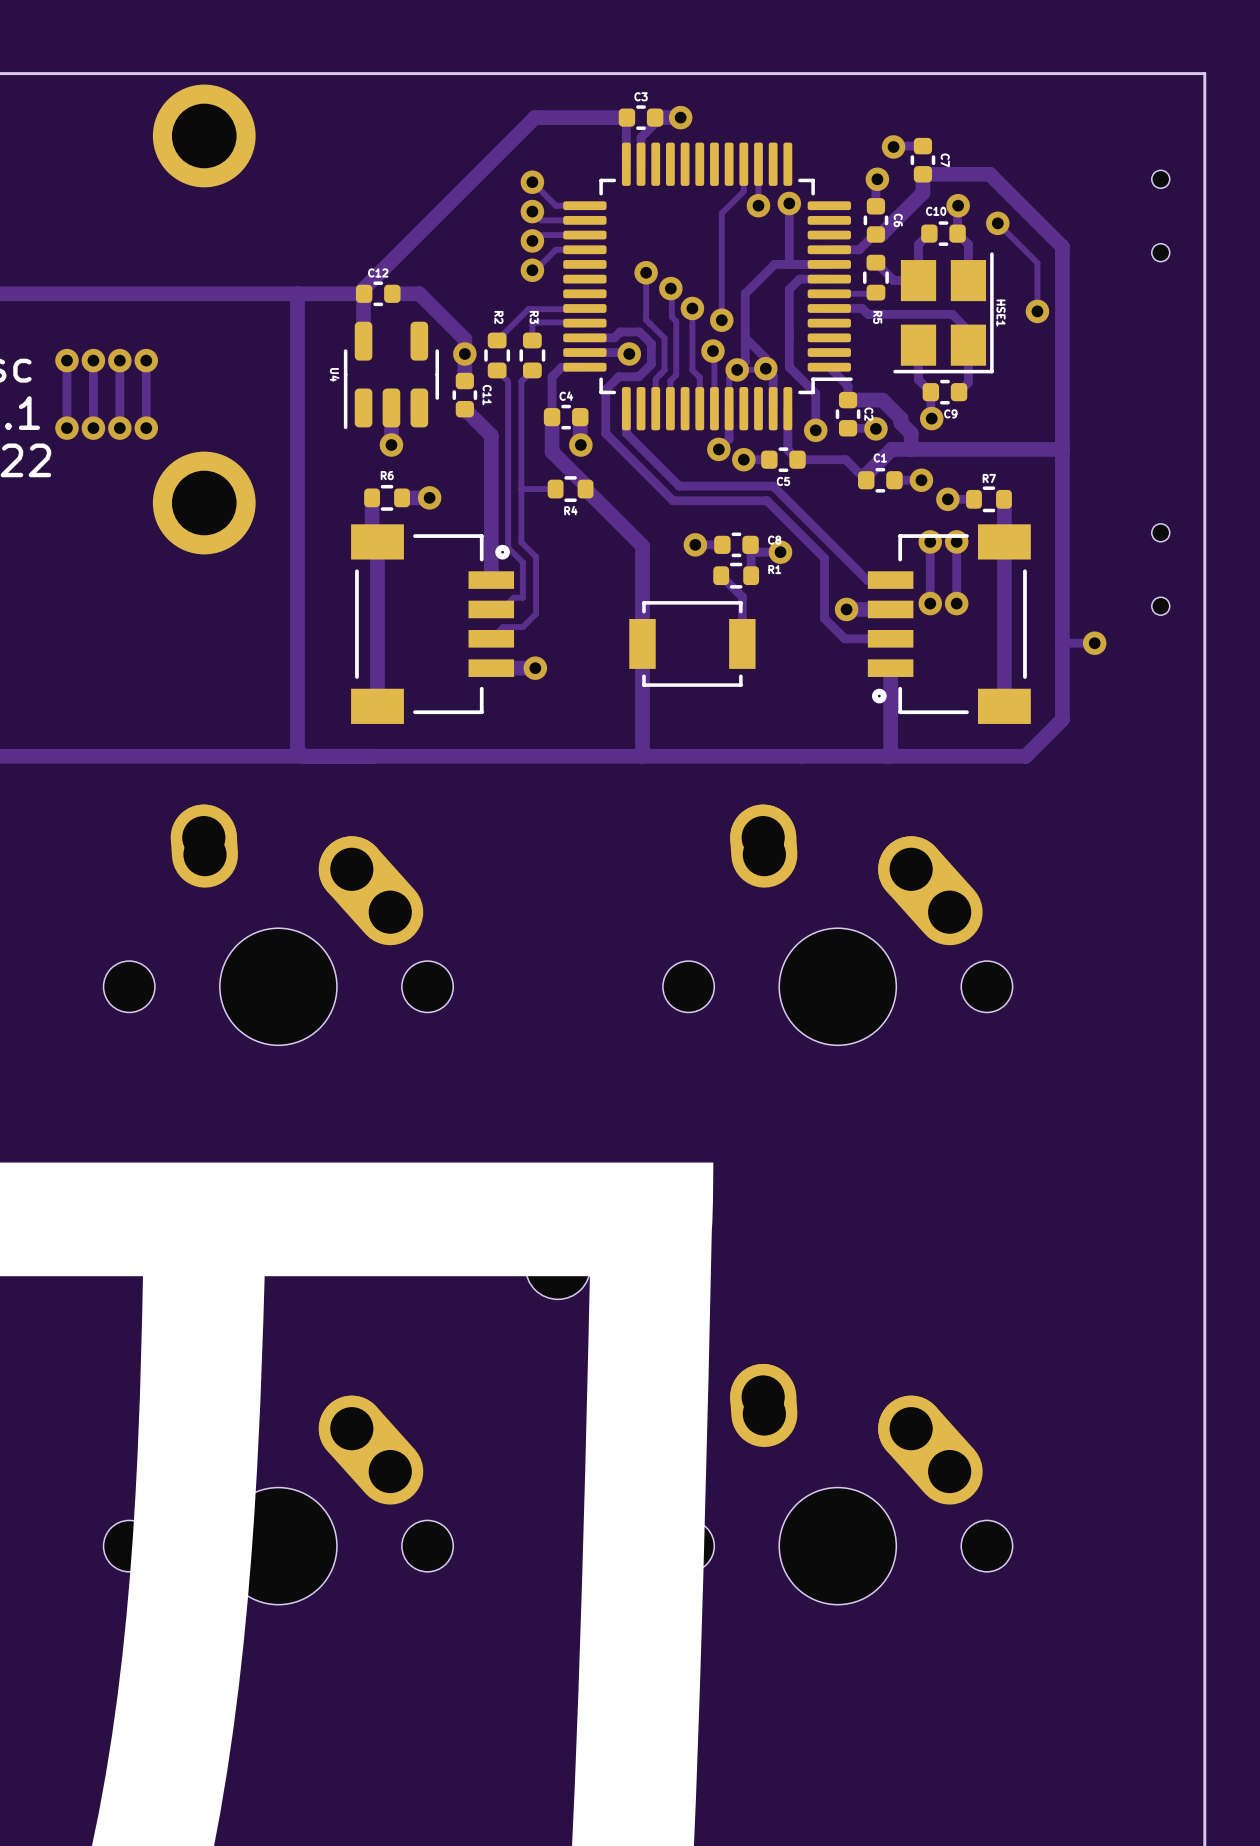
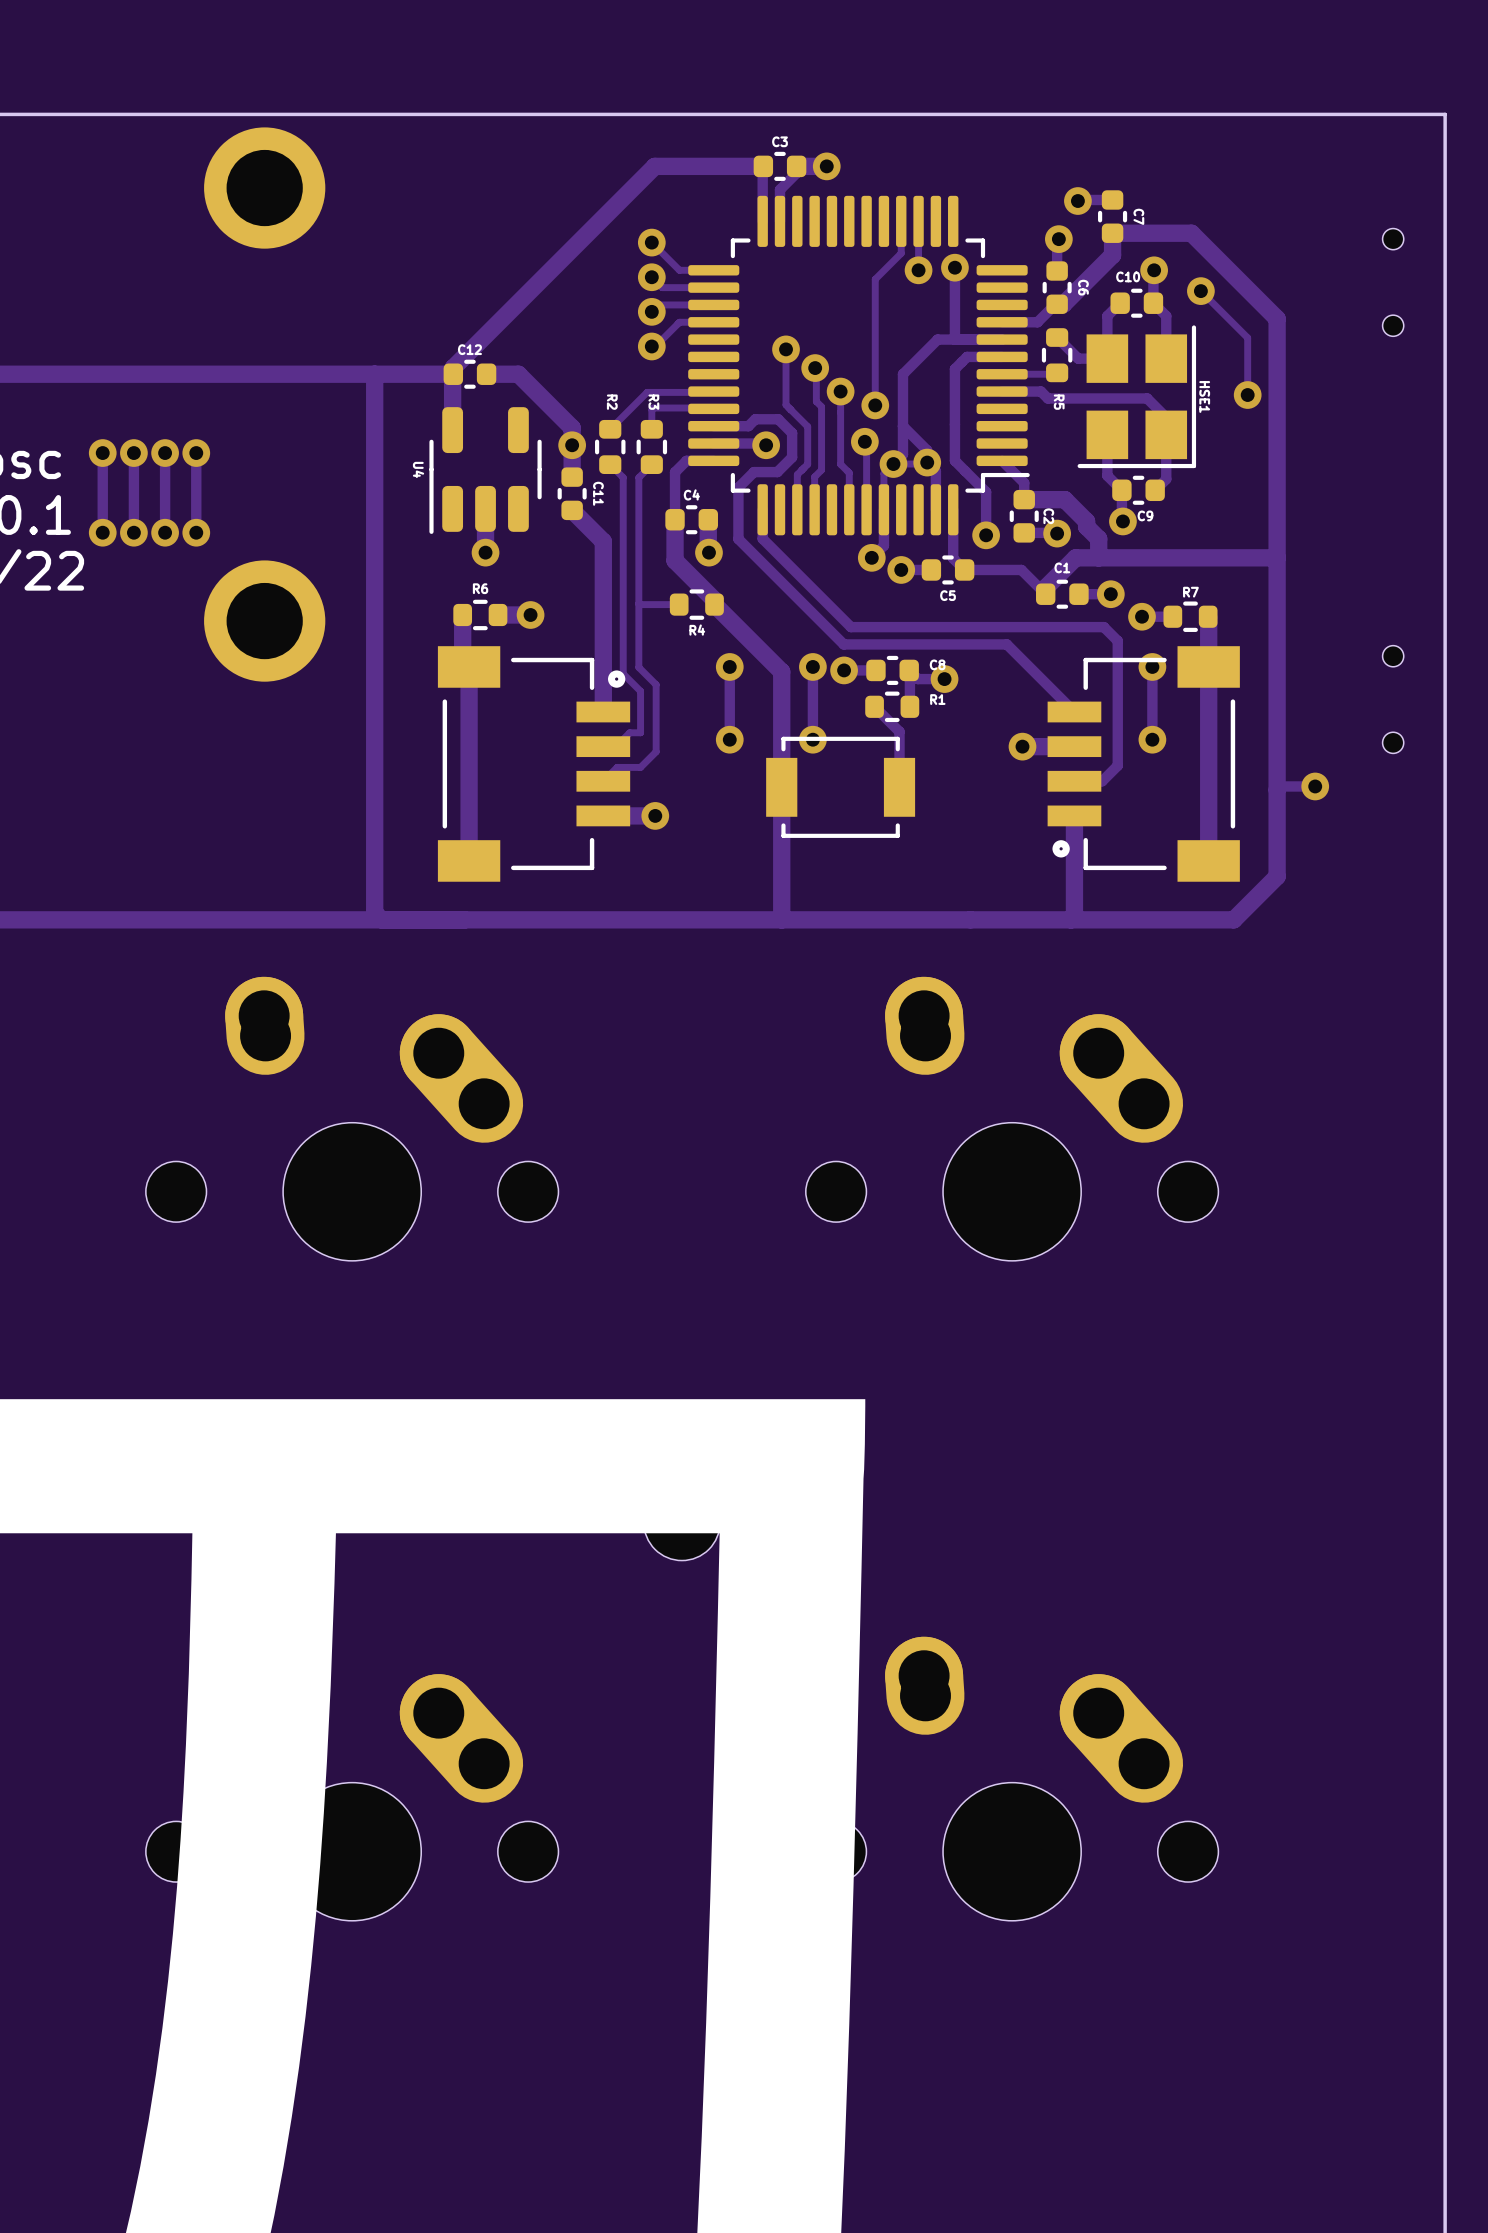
track: (679, 486) (773, 486) (867, 580) (890, 580) -> (817, 618) (843, 644) (1006, 644) (1074, 711)
track: (673, 500) (767, 500) (824, 558) (824, 618) (844, 638) (890, 638) -> (824, 601) (850, 627) (1103, 627) (1117, 640) (1117, 765) (1102, 781) (1074, 781)
via: none -> (729, 666)
via: none -> (812, 666)
via: (930, 541) -> none
track: none -> (729, 673) (729, 739)
track: (930, 547) (930, 603) -> (812, 673) (812, 739)
via: none -> (729, 739)
via: none -> (812, 739)
via: (930, 603) -> none

